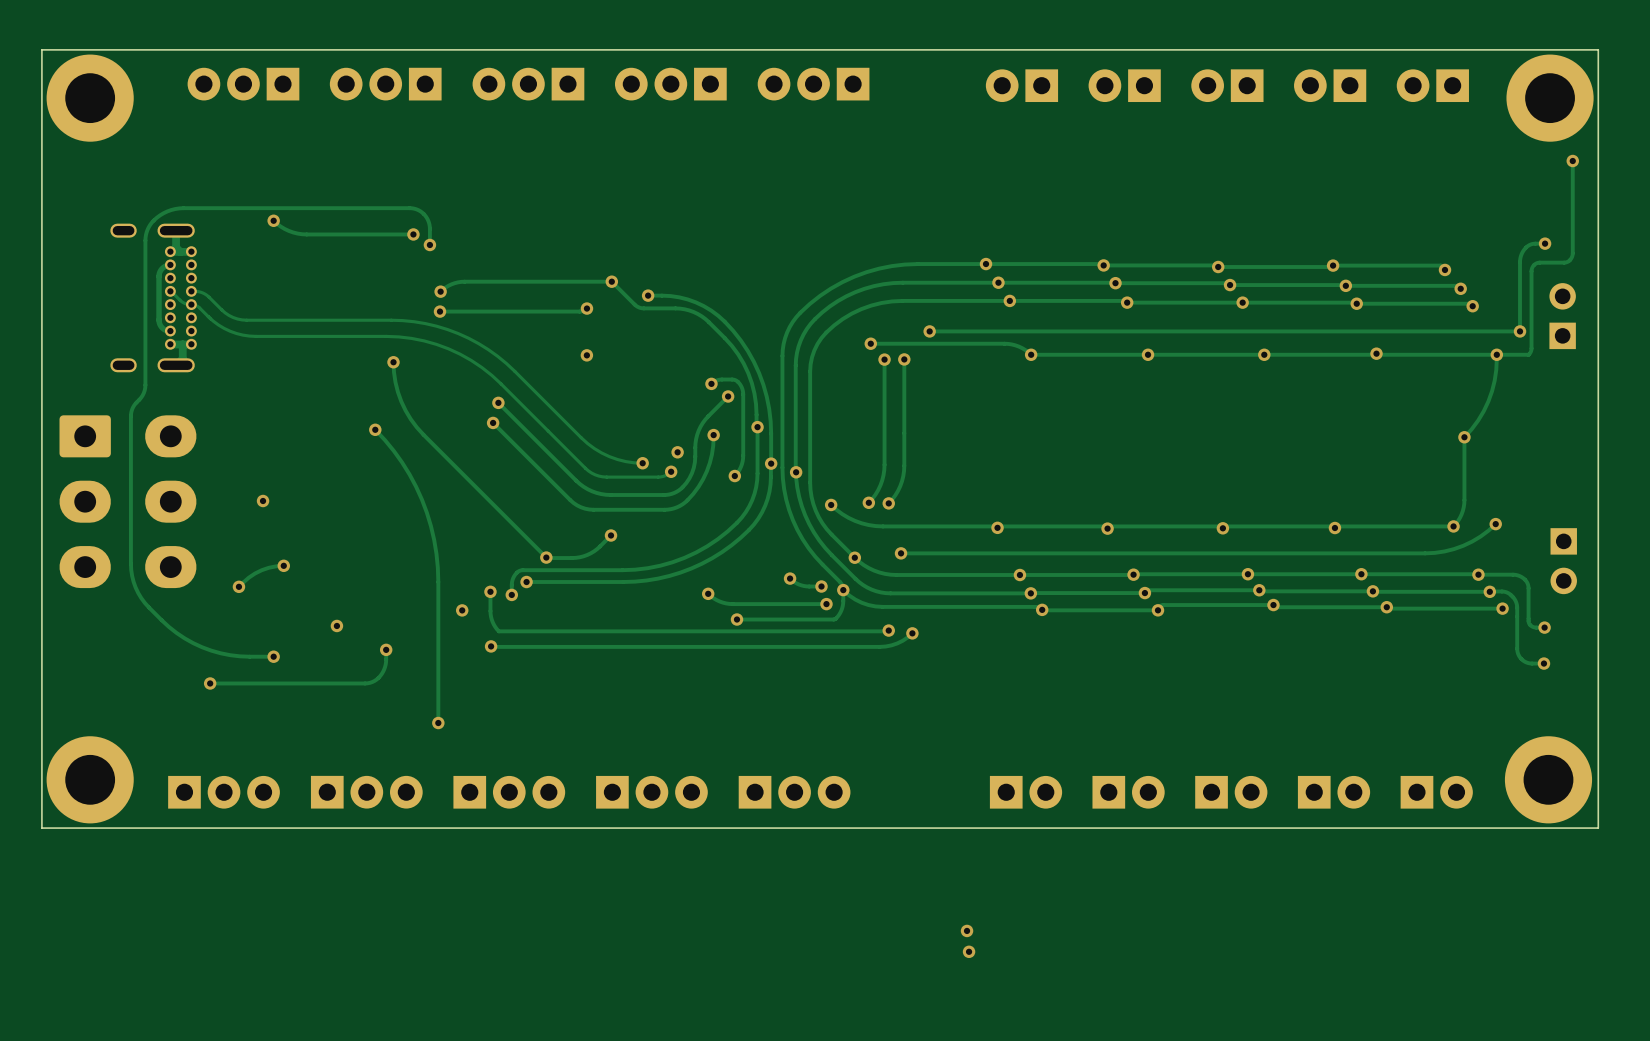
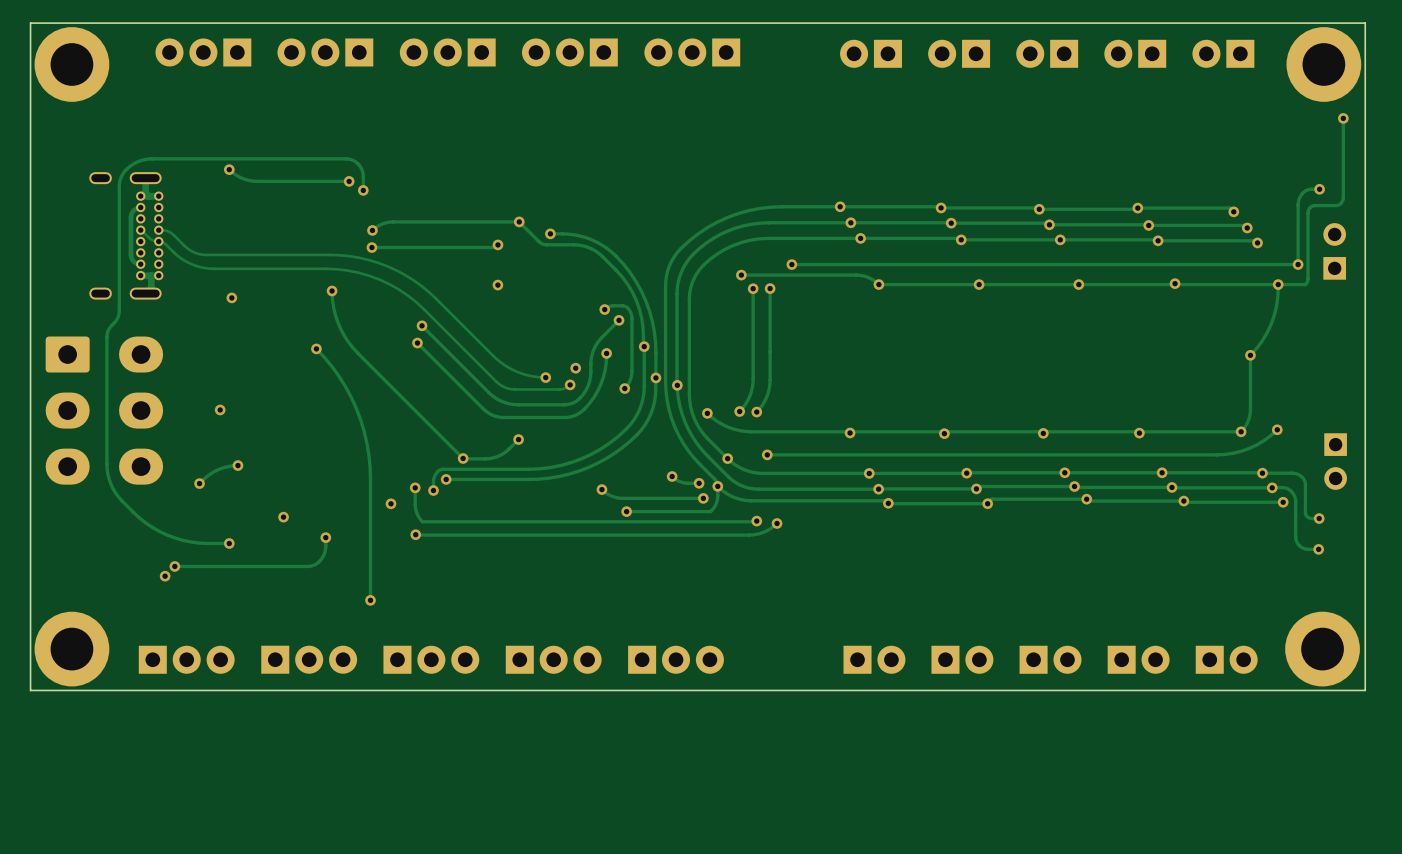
via: none -> (231, 297)
via: none -> (165, 576)
via: (967, 930) -> none
via: (969, 951) -> none

